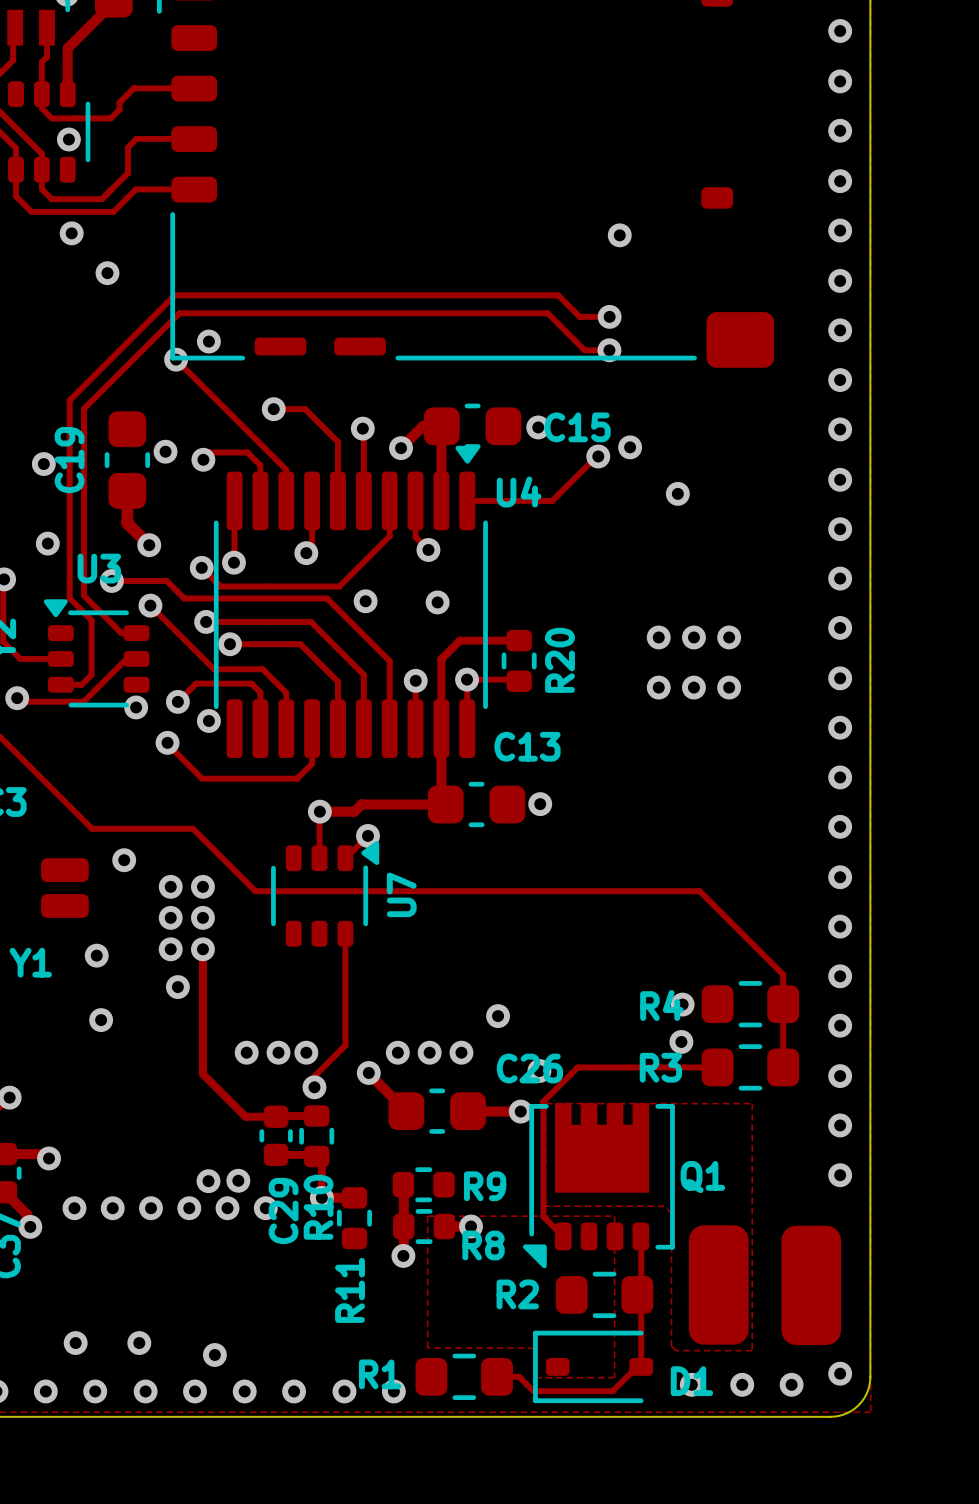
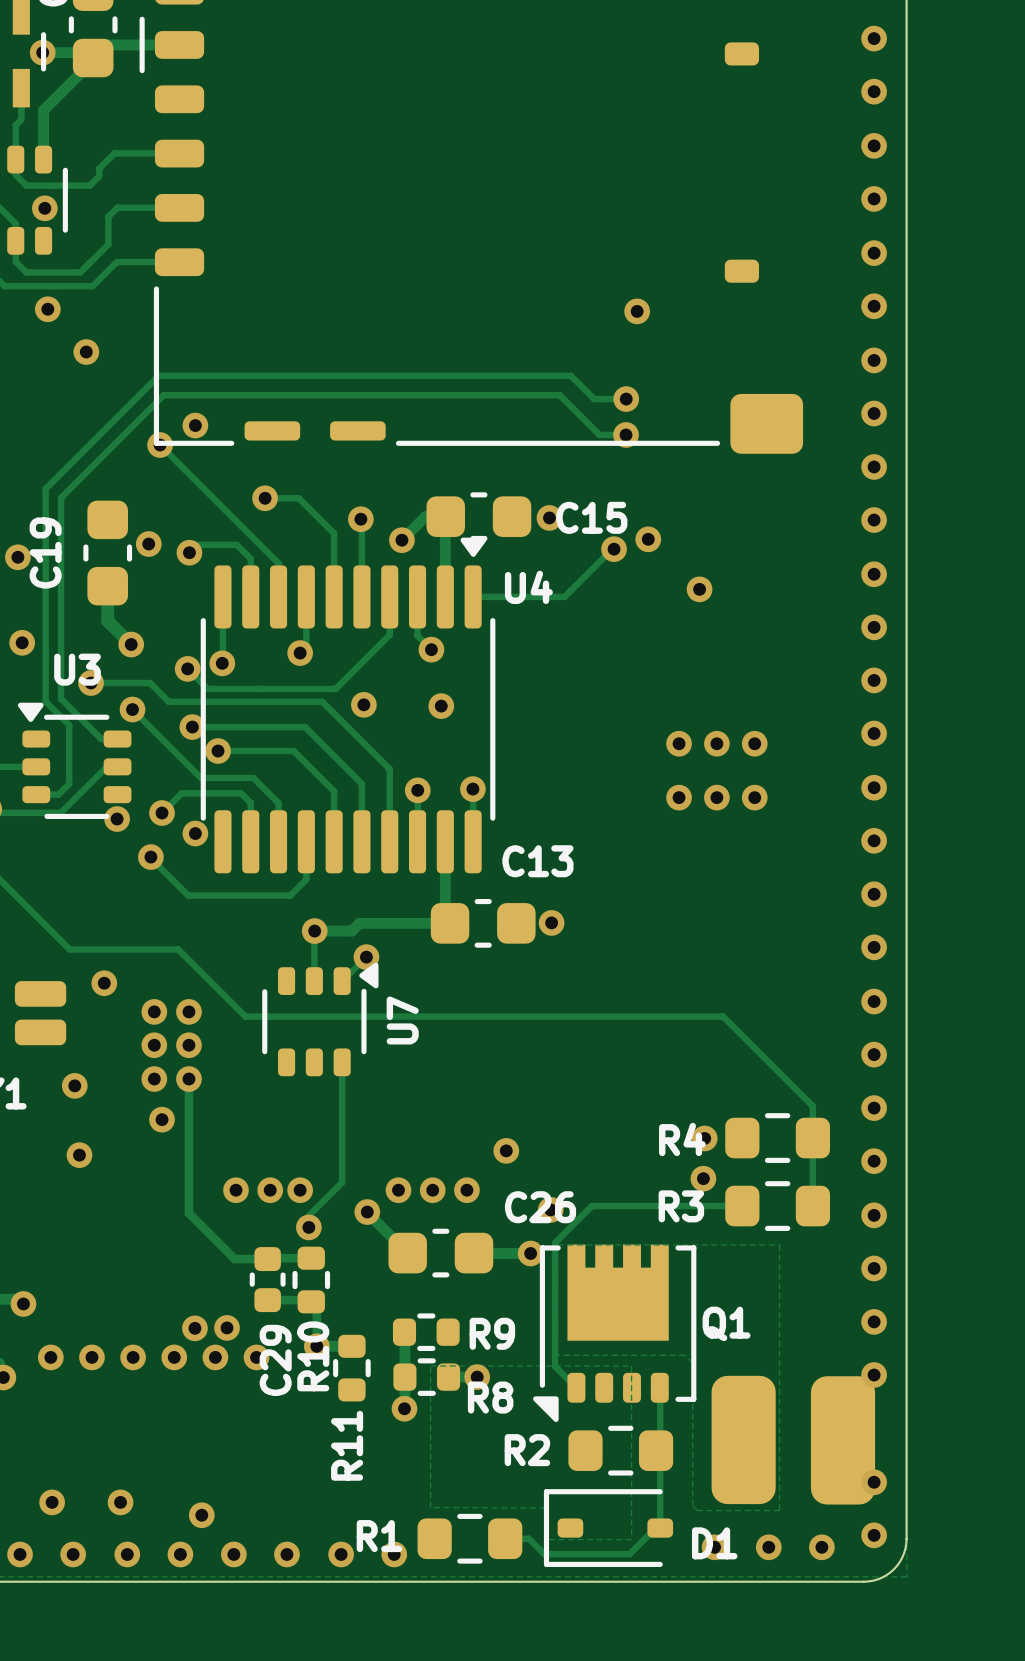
track: (519, 640) (459, 640) (441, 659) (441, 728) -> none
R20: (519, 660) -> none
track: (467, 679) (517, 679) (519, 681) -> none
via: none -> (874, 1374)
via: none -> (874, 1482)

